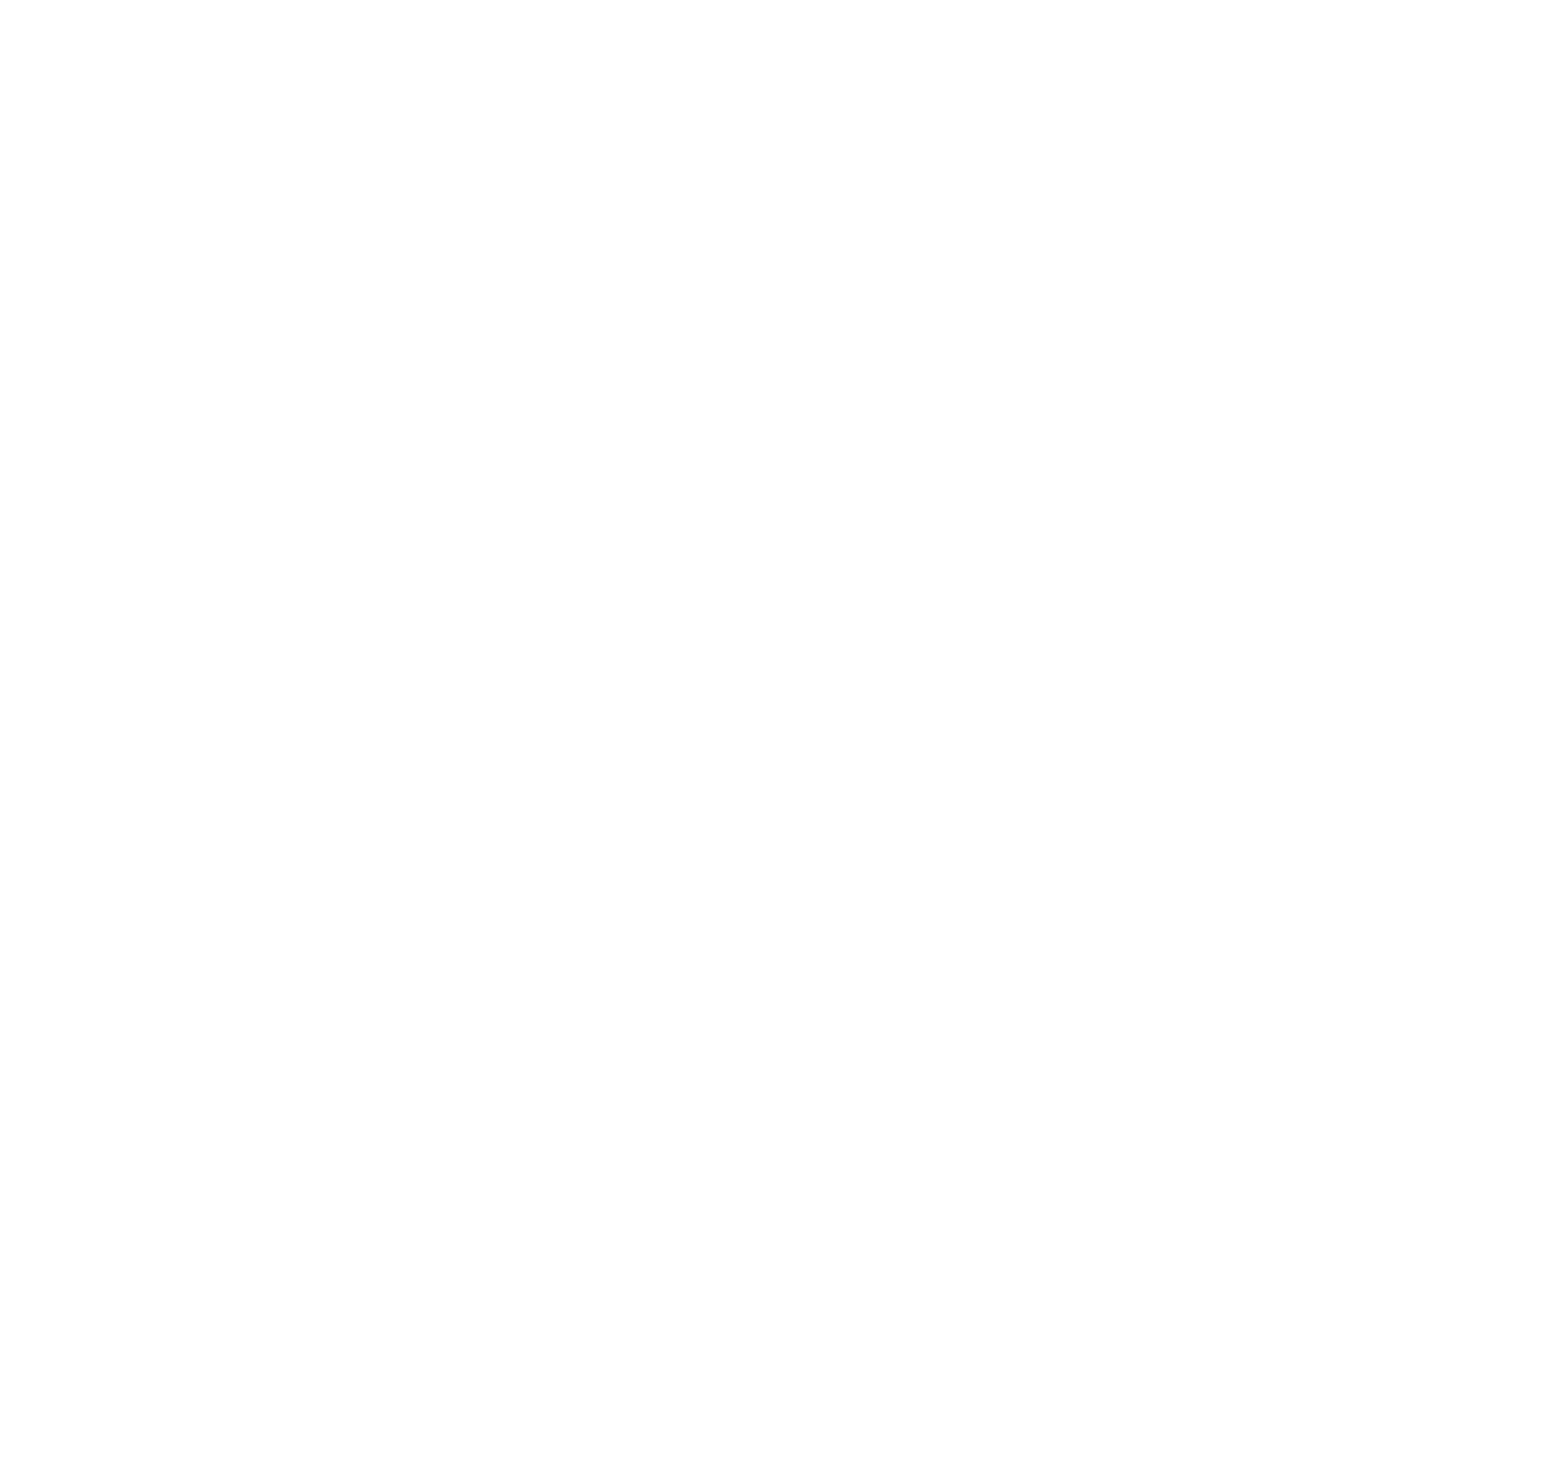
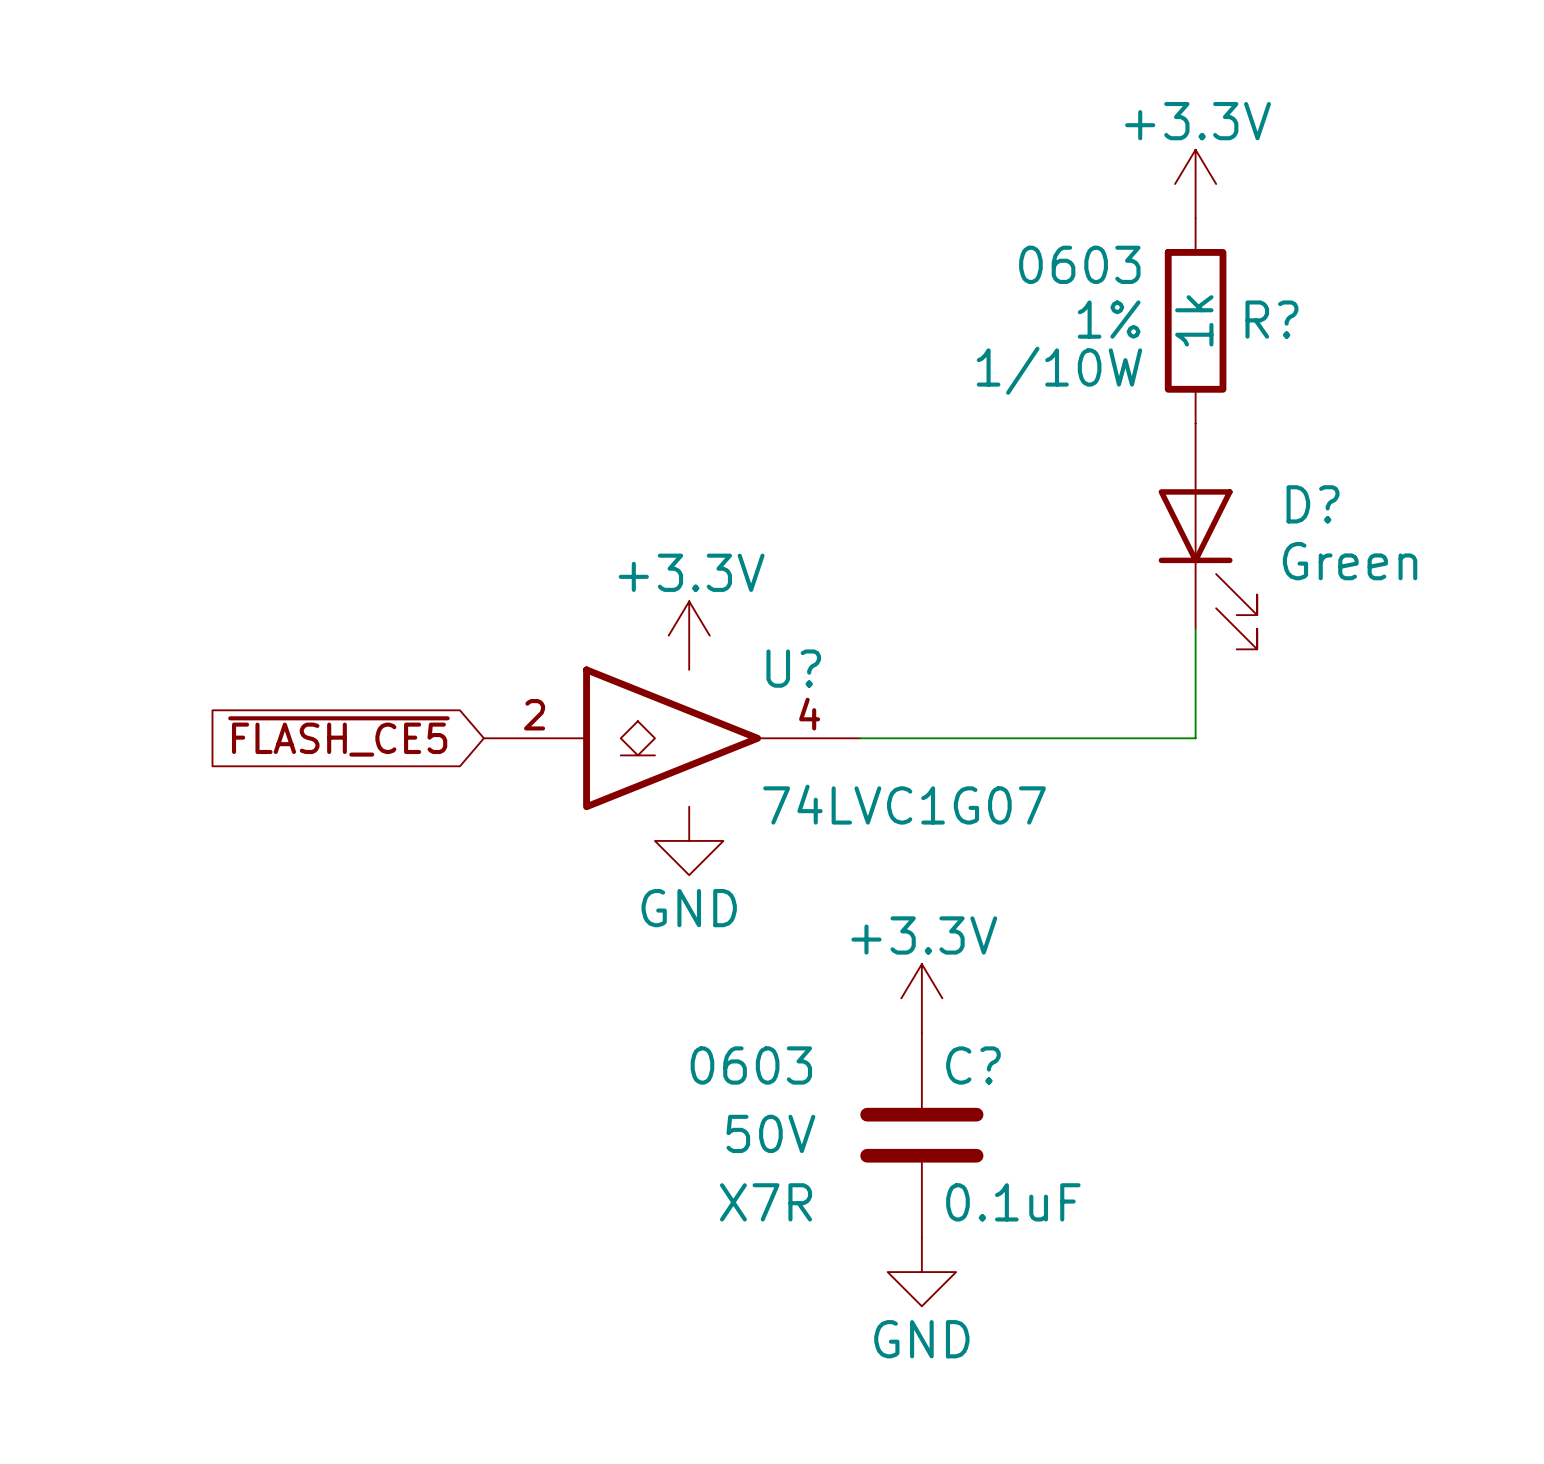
power symbol: none -> +3.3V (1195, 183)
R?: none -> 1k (1195, 320)
D?: none -> Green (1207, 536)
wire: none -> (1195, 628) (1195, 738) (860, 738)
power symbol: none -> +3.3V (689, 635)
U?: none -> 74LVC1G07 (672, 738)
global label: none -> ~{FLASH_CE5} (338, 736)
power symbol: none -> GND (689, 840)
power symbol: none -> +3.3V (921, 998)
C?: none -> 0.1uF (921, 1135)
power symbol: none -> GND (921, 1272)

